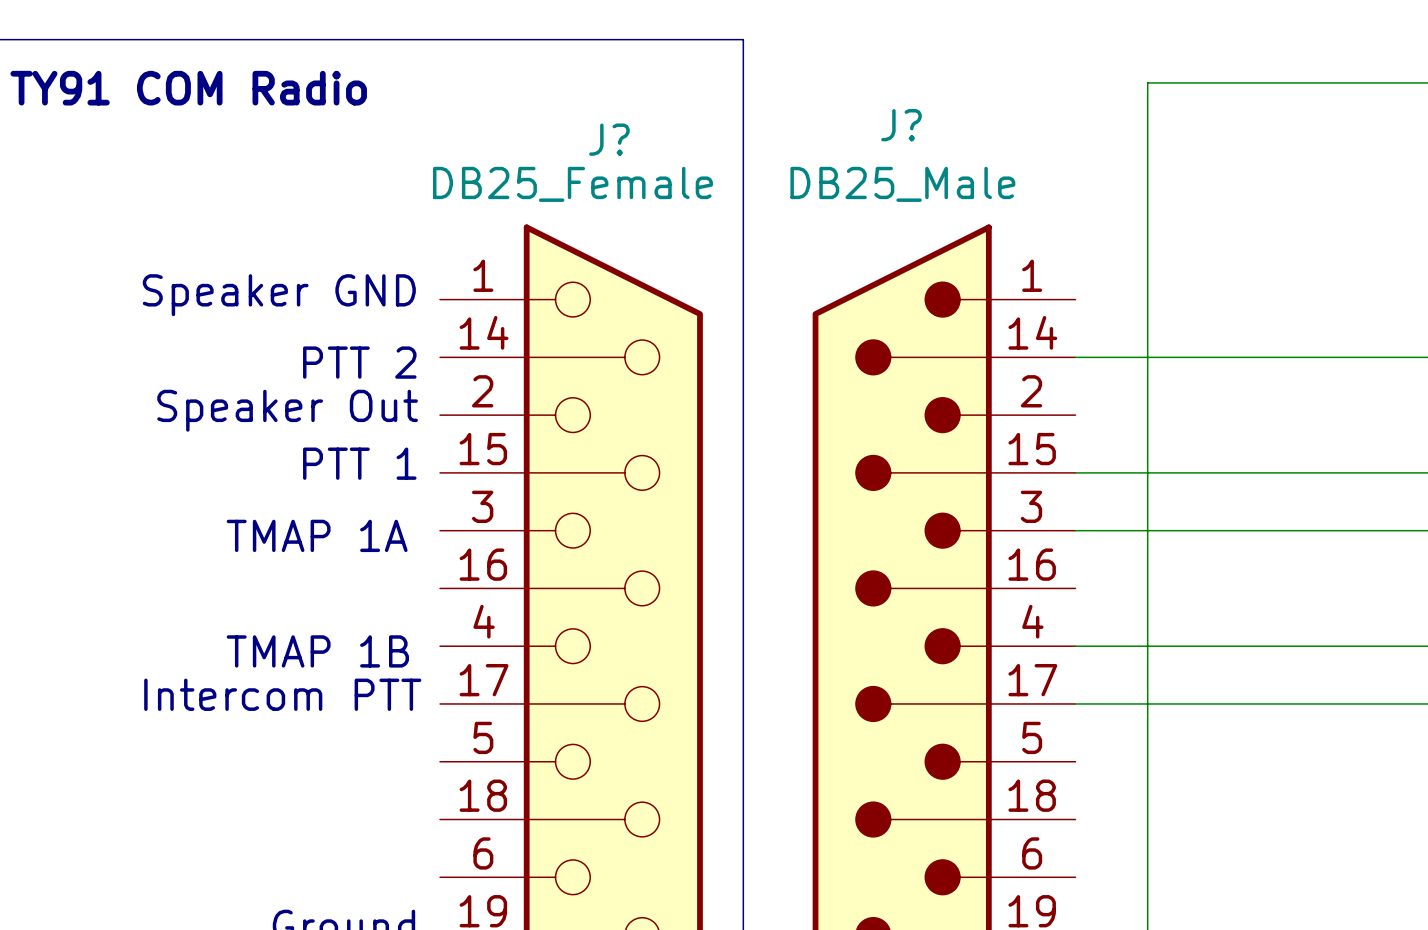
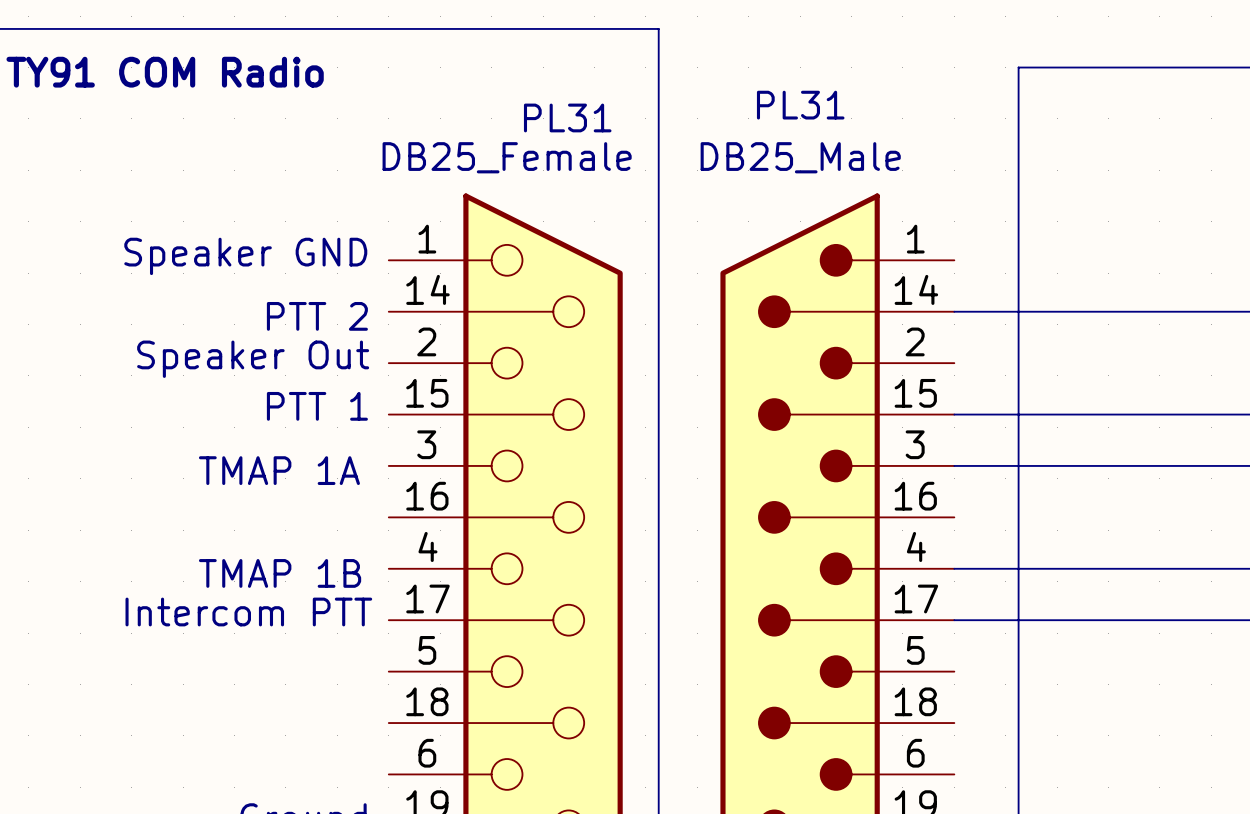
J? name: J? (901, 125) -> PL31 (800, 105)
J? name: J? (609, 139) -> PL31 (567, 117)

